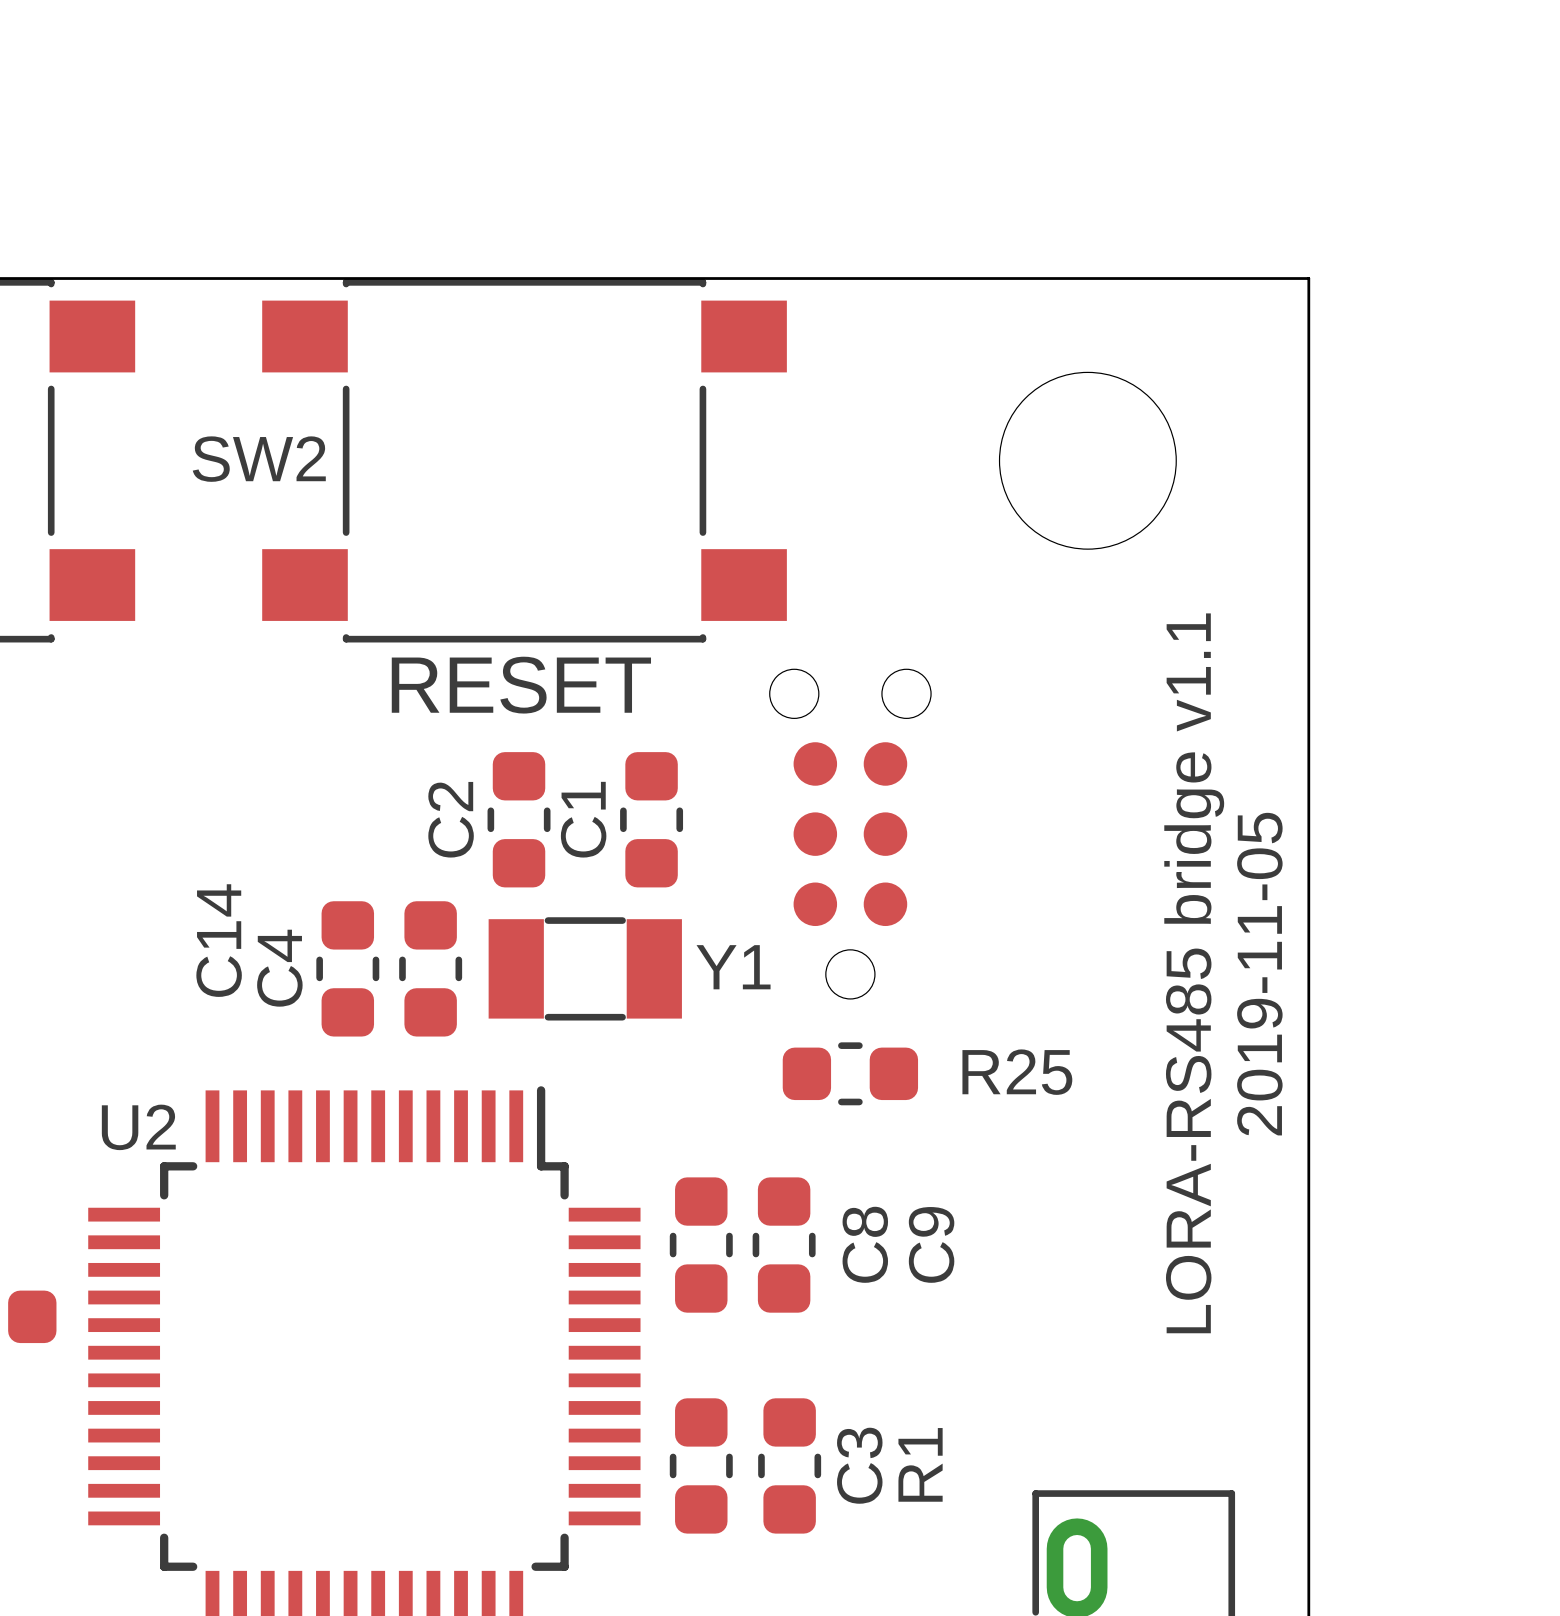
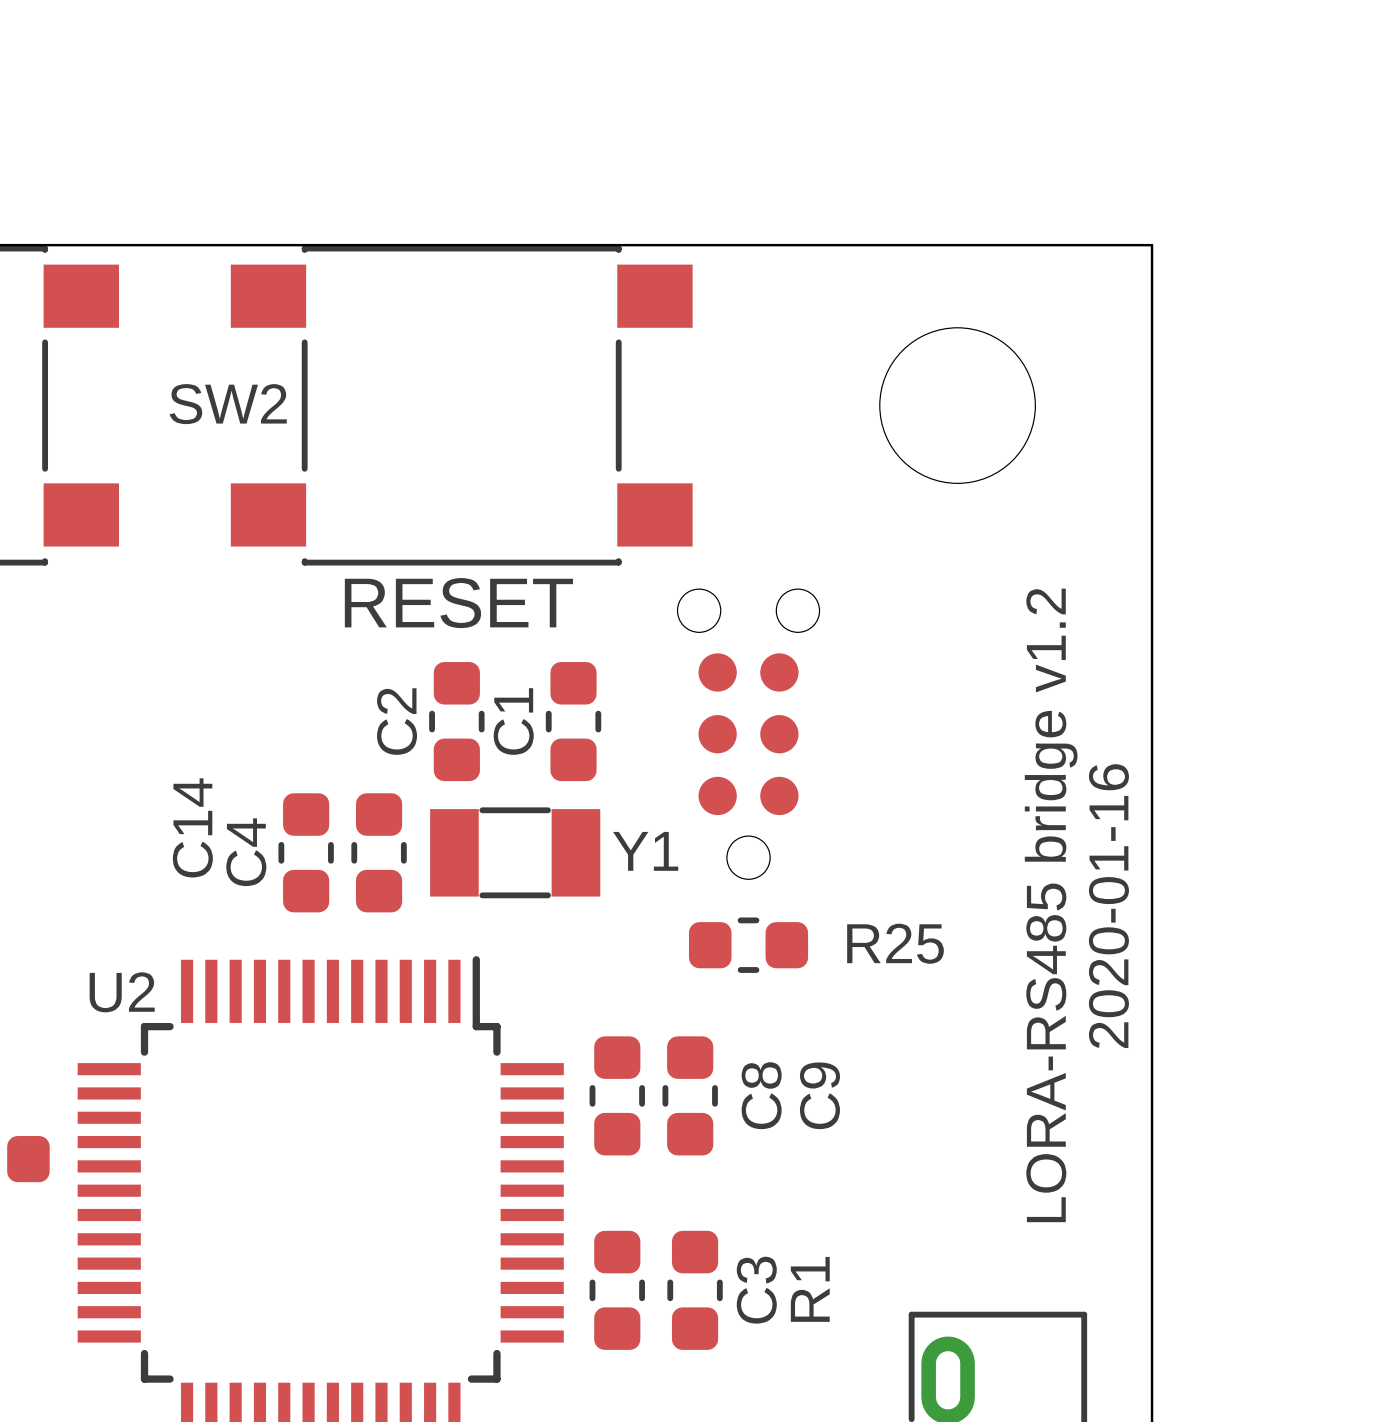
text: LORA-RS485 bridge v1.1 (1194, 973) -> LORA-RS485 bridge v1.2 (1051, 905)
text: 2019-11-05 (1259, 974) -> none
text: none -> 2020-01-16 (1108, 906)

